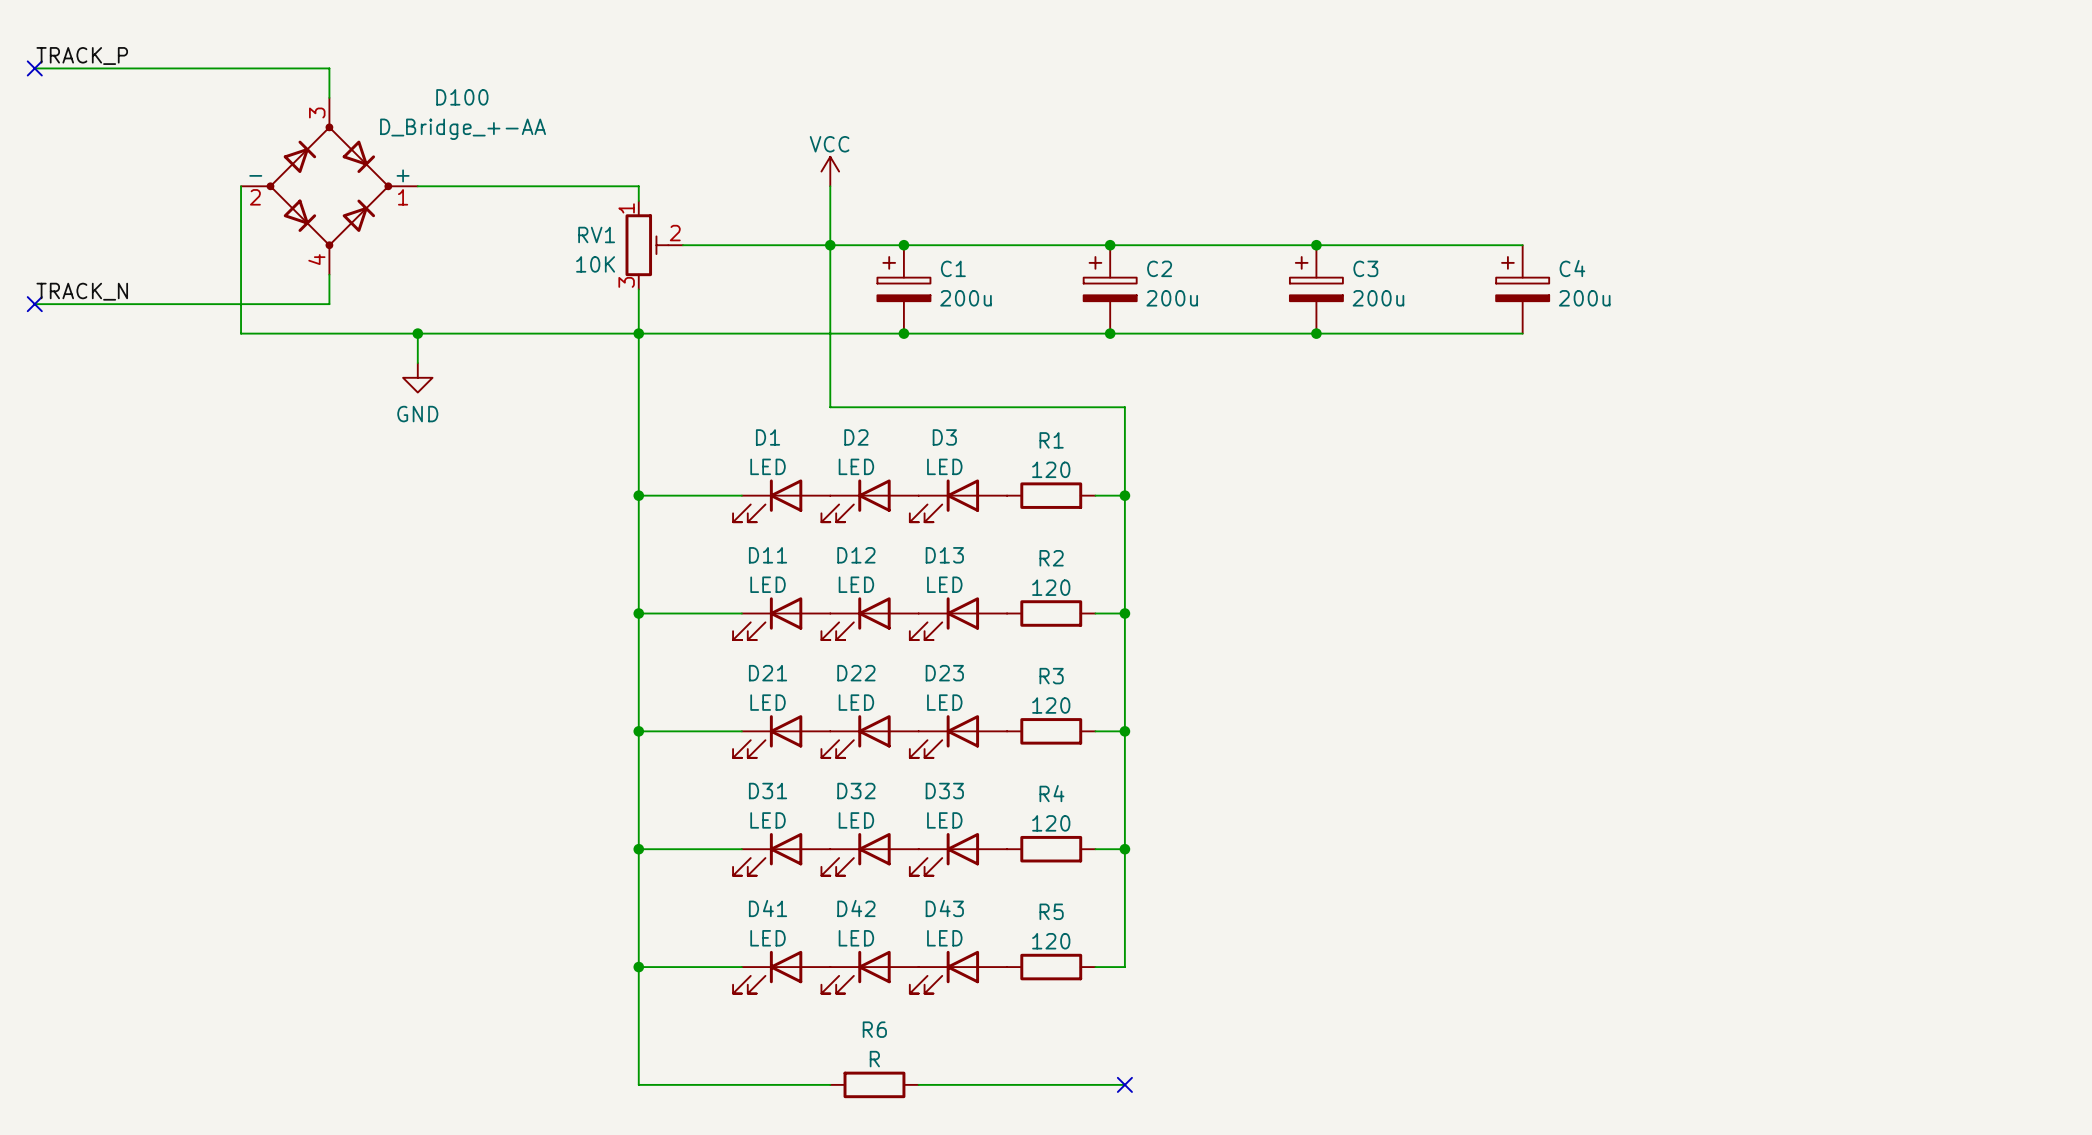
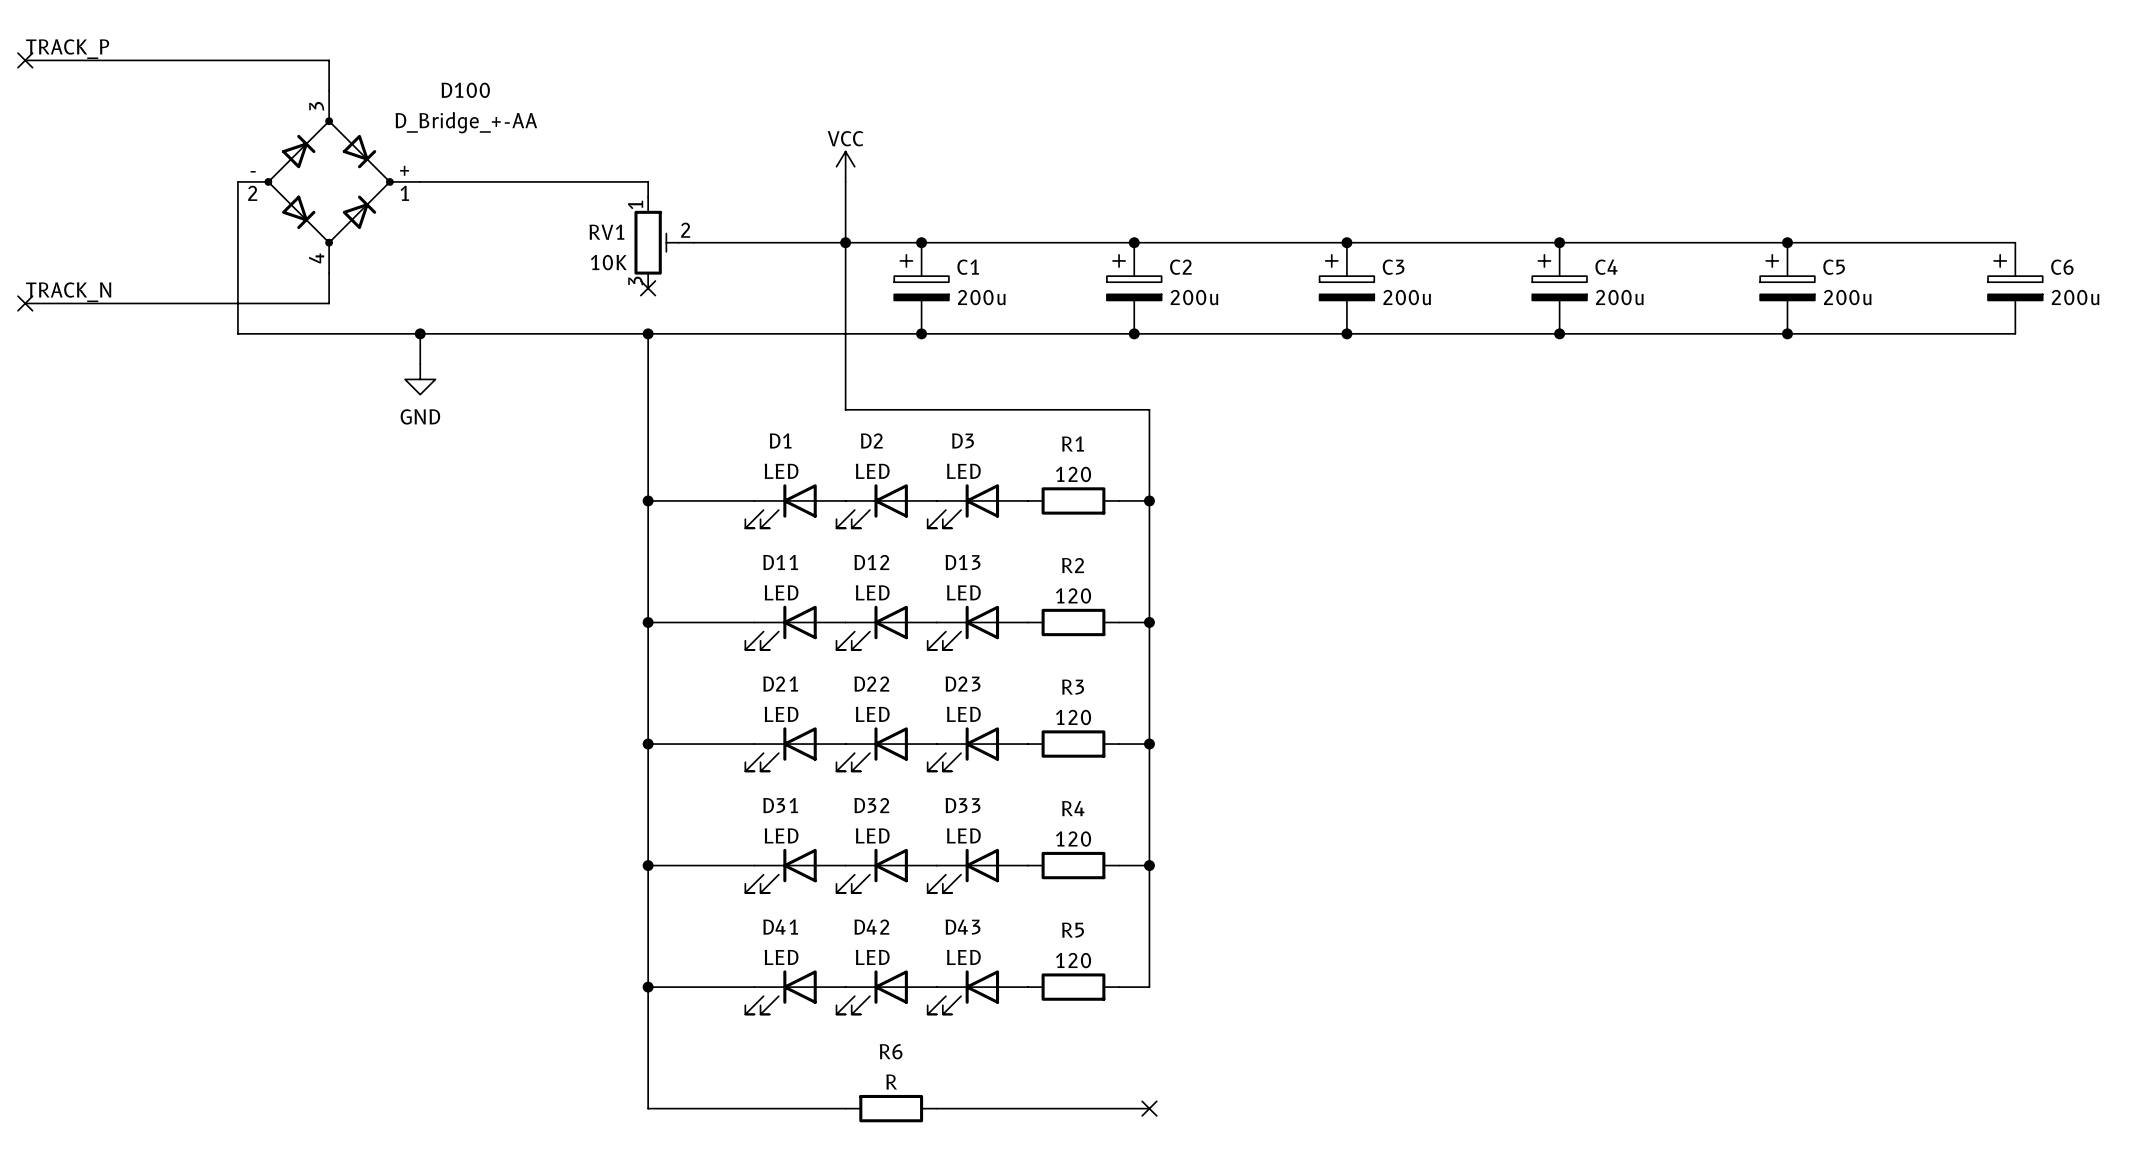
wire: none -> (1559, 242) (2015, 242)
junction: none -> (1559, 242)
junction: none -> (1787, 242)
wire: (638, 289) (638, 333) -> none
no-connect mark: none -> (648, 288)
C5: none -> 200u (1787, 288)
C6: none -> 200u (2015, 288)
wire: none -> (1559, 333) (2015, 333)
junction: none -> (1559, 333)
junction: none -> (1787, 333)

